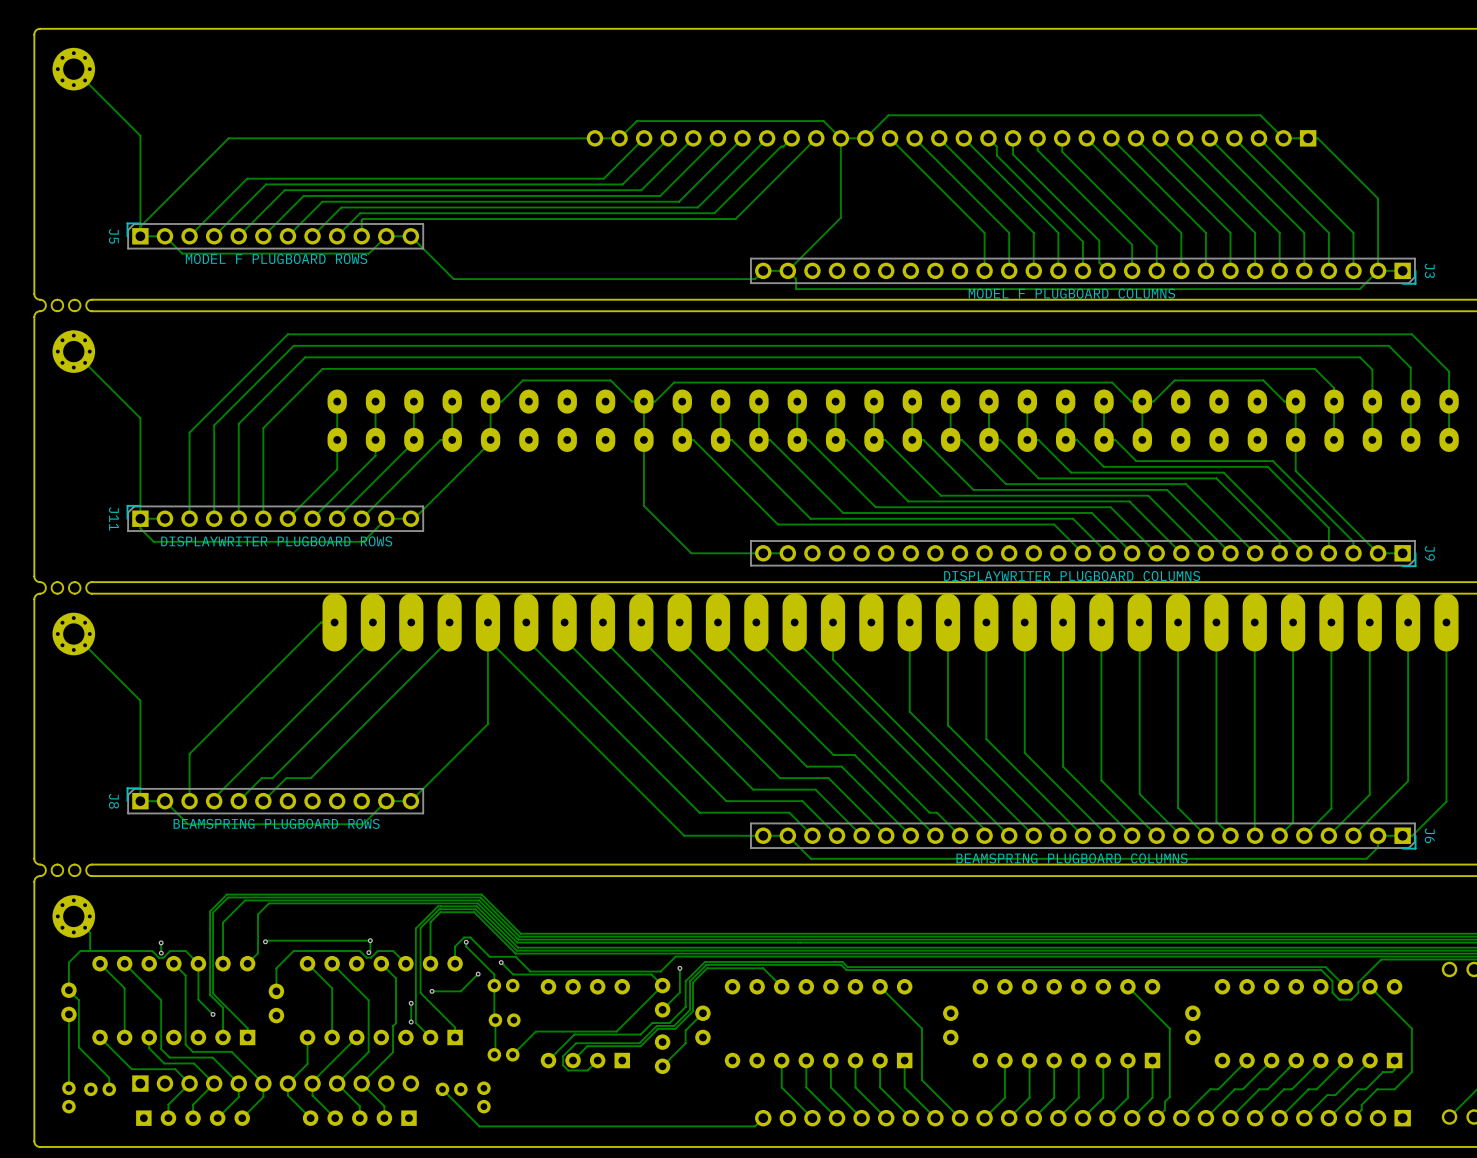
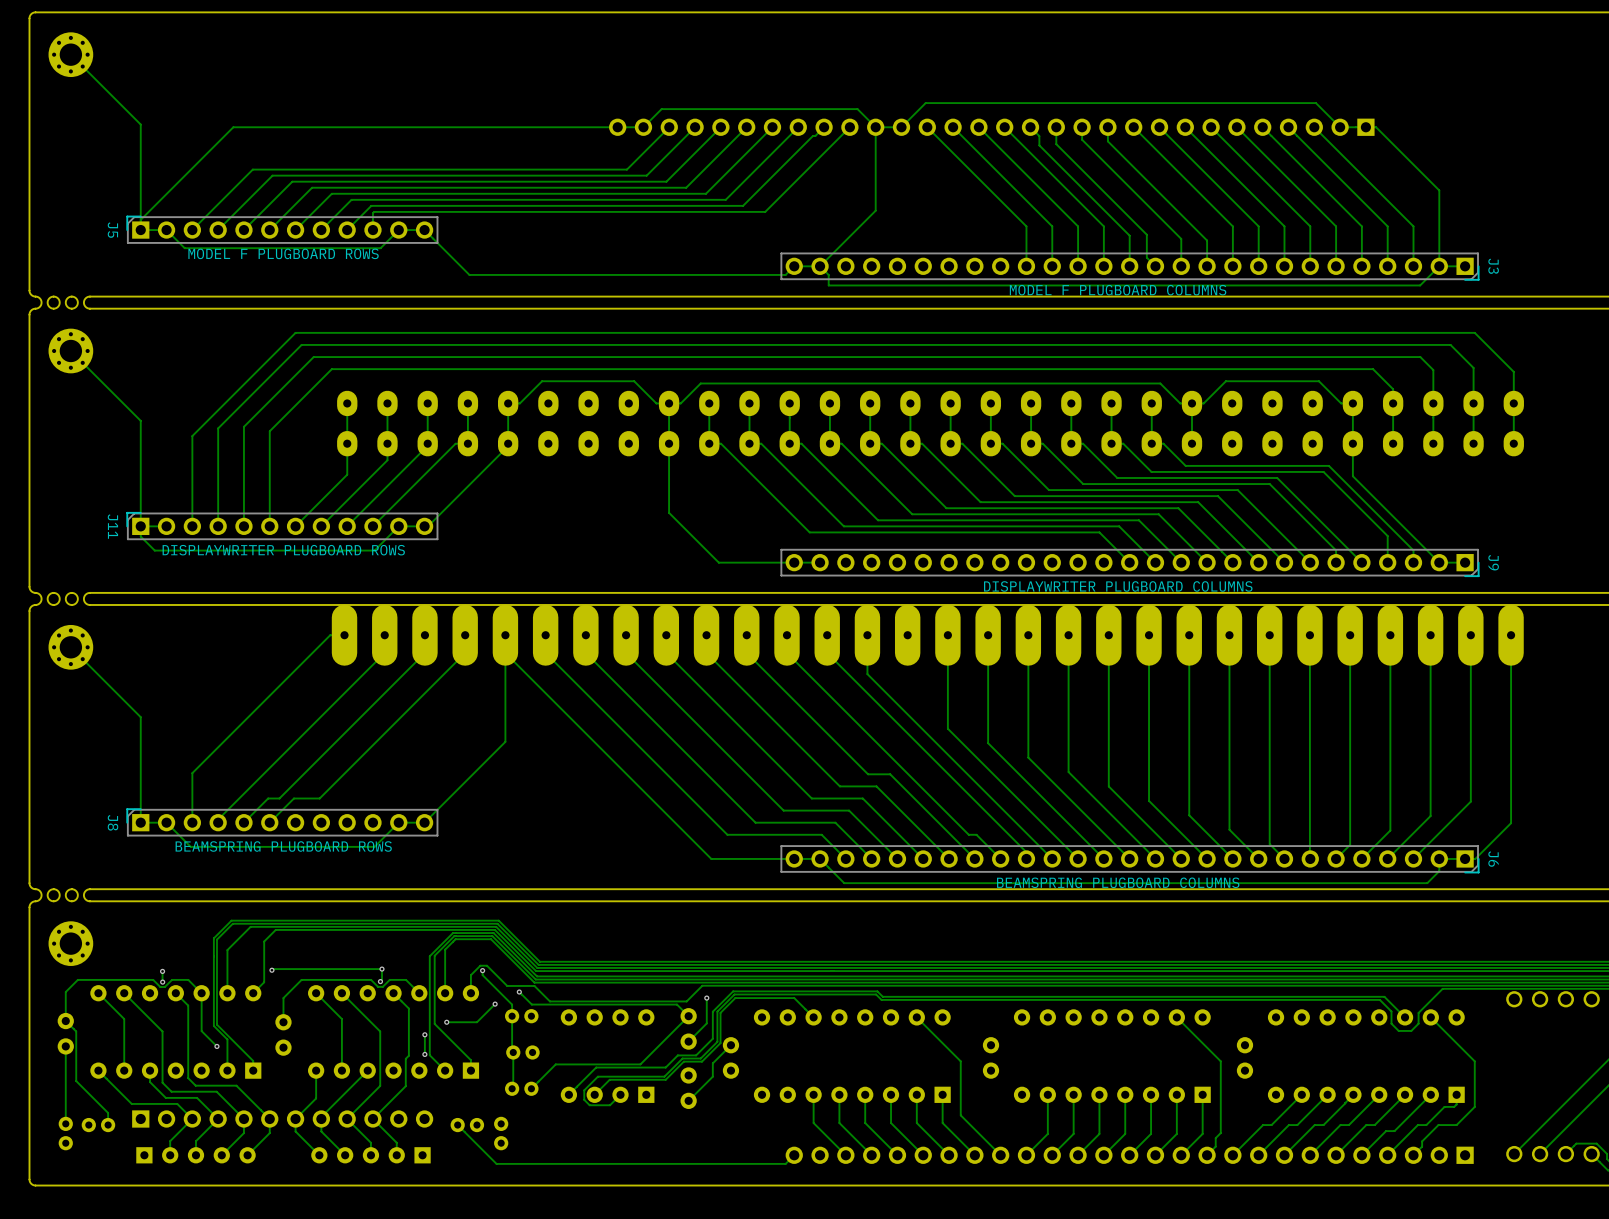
track: (73, 916) (90, 932) (90, 951) -> none

